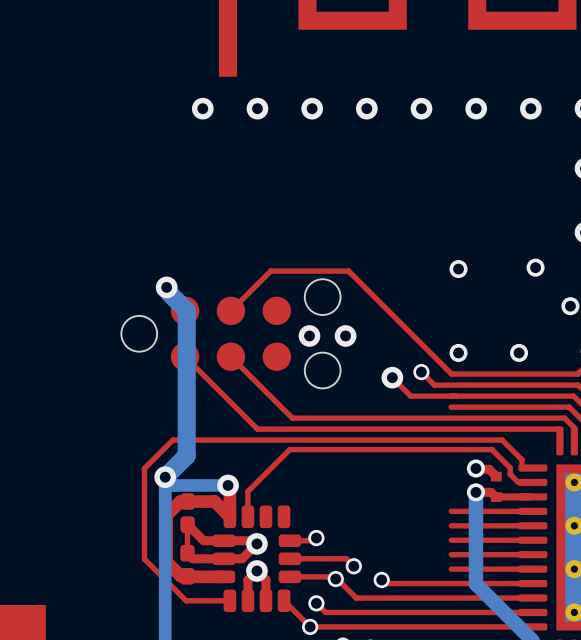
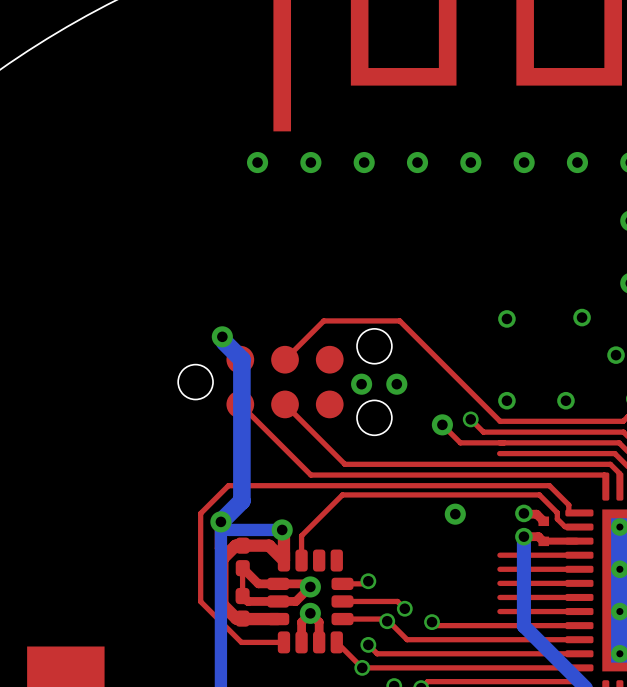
via: none -> (455, 514)

